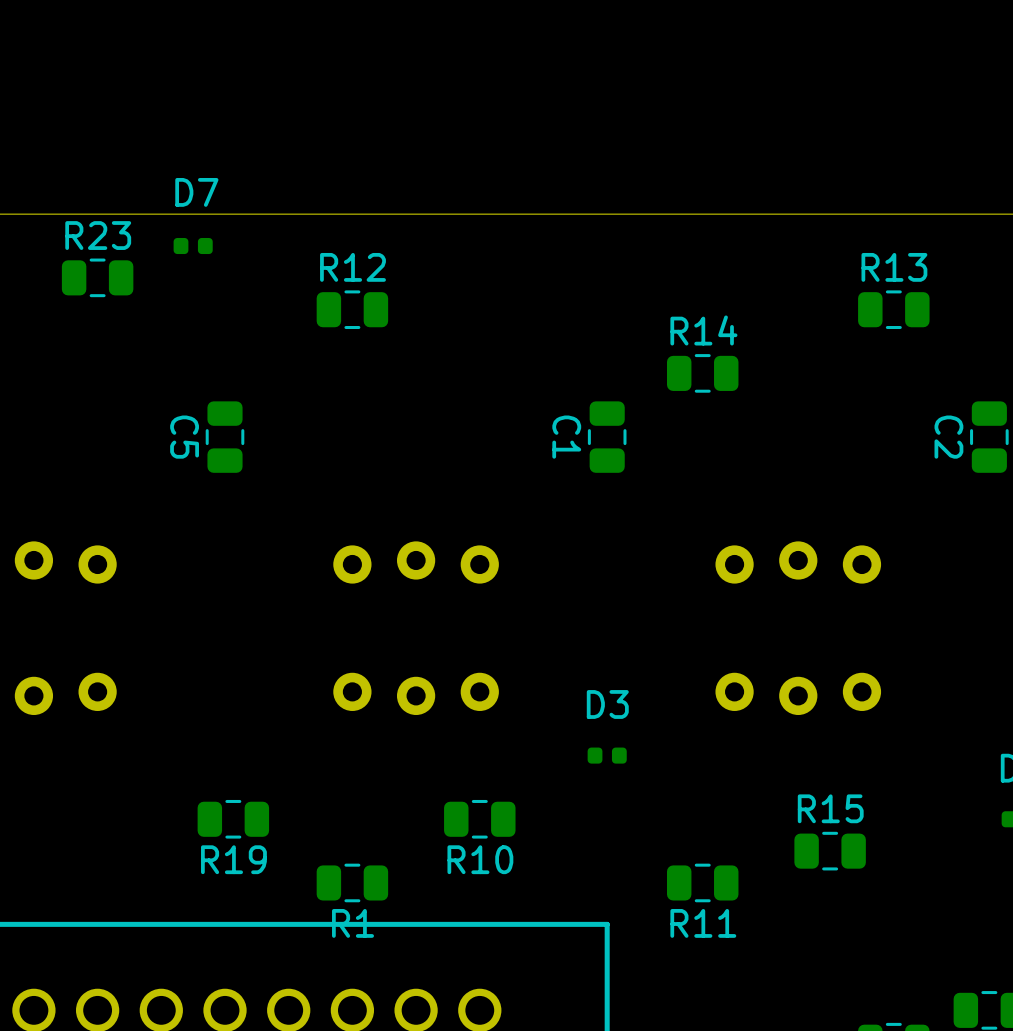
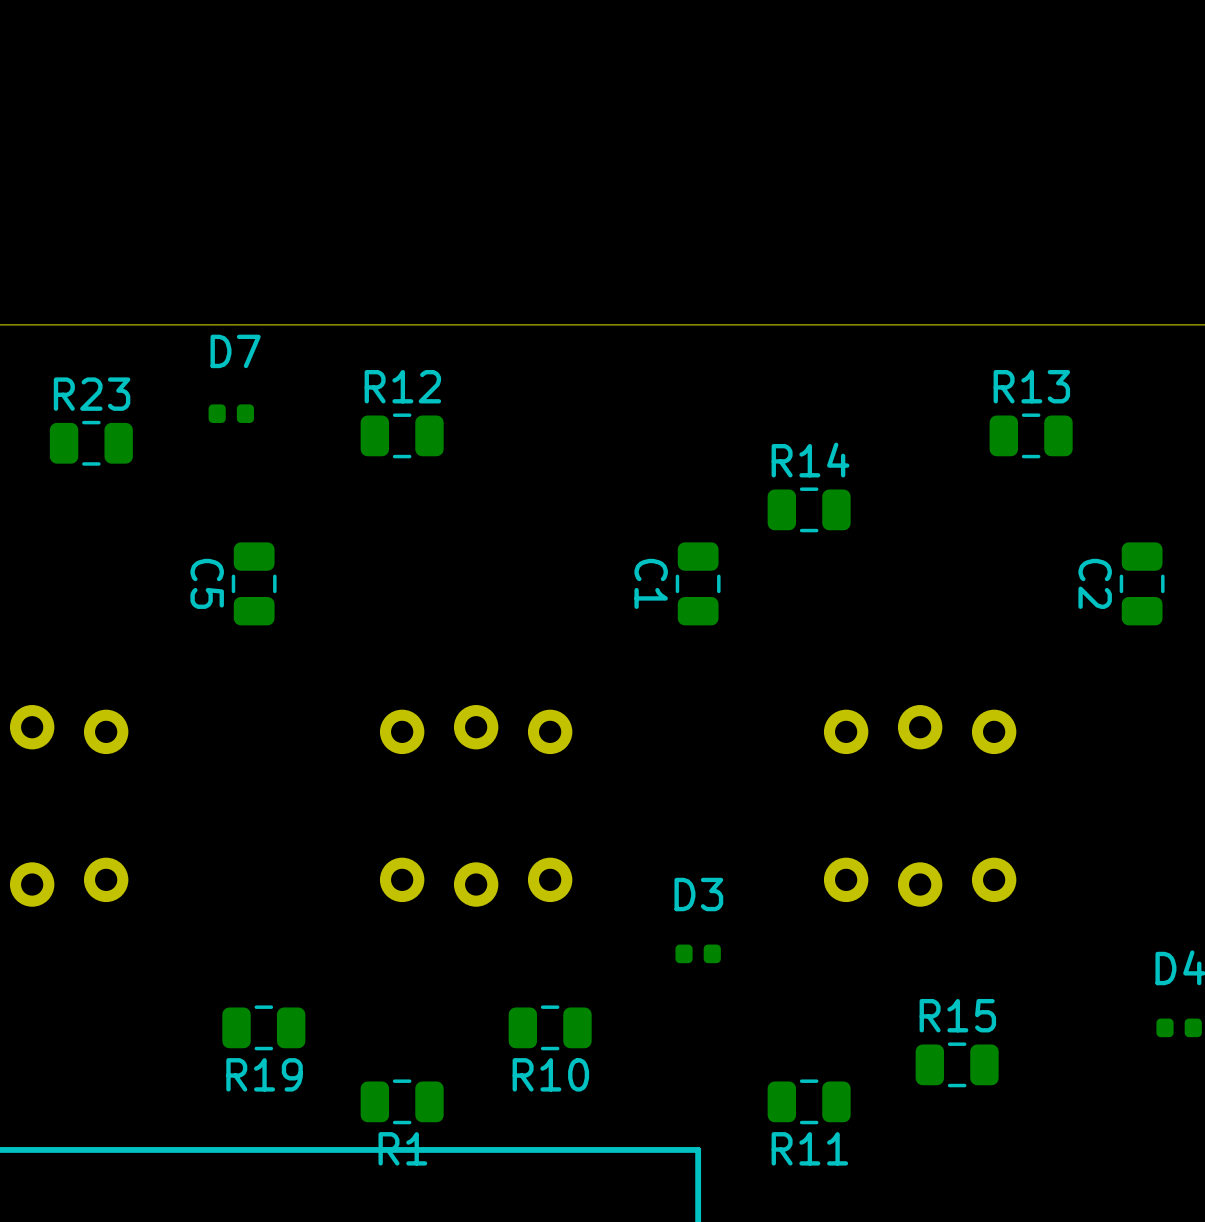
D7 position: (193, 246) -> (231, 413)
R23 position: (97, 277) -> (91, 443)

